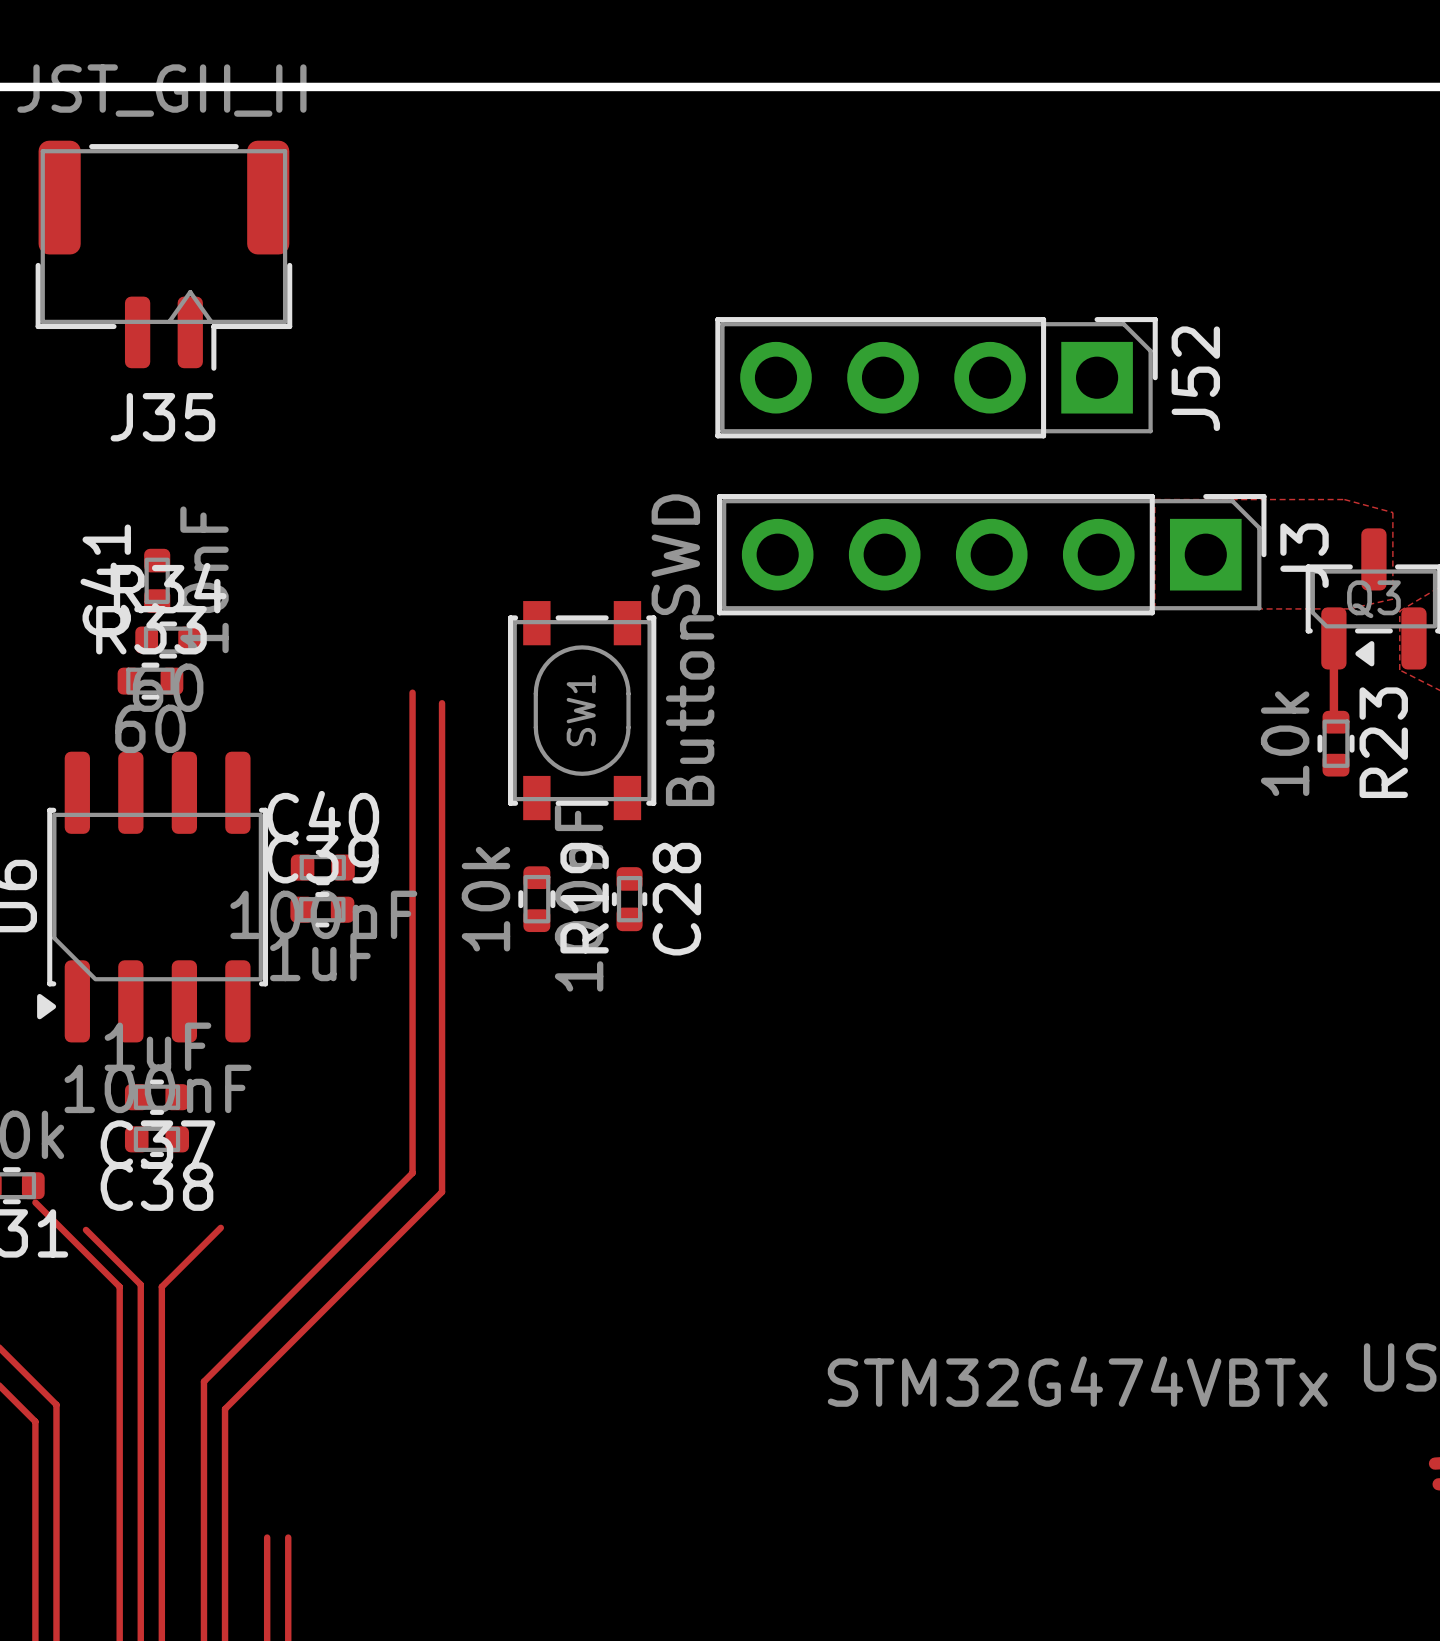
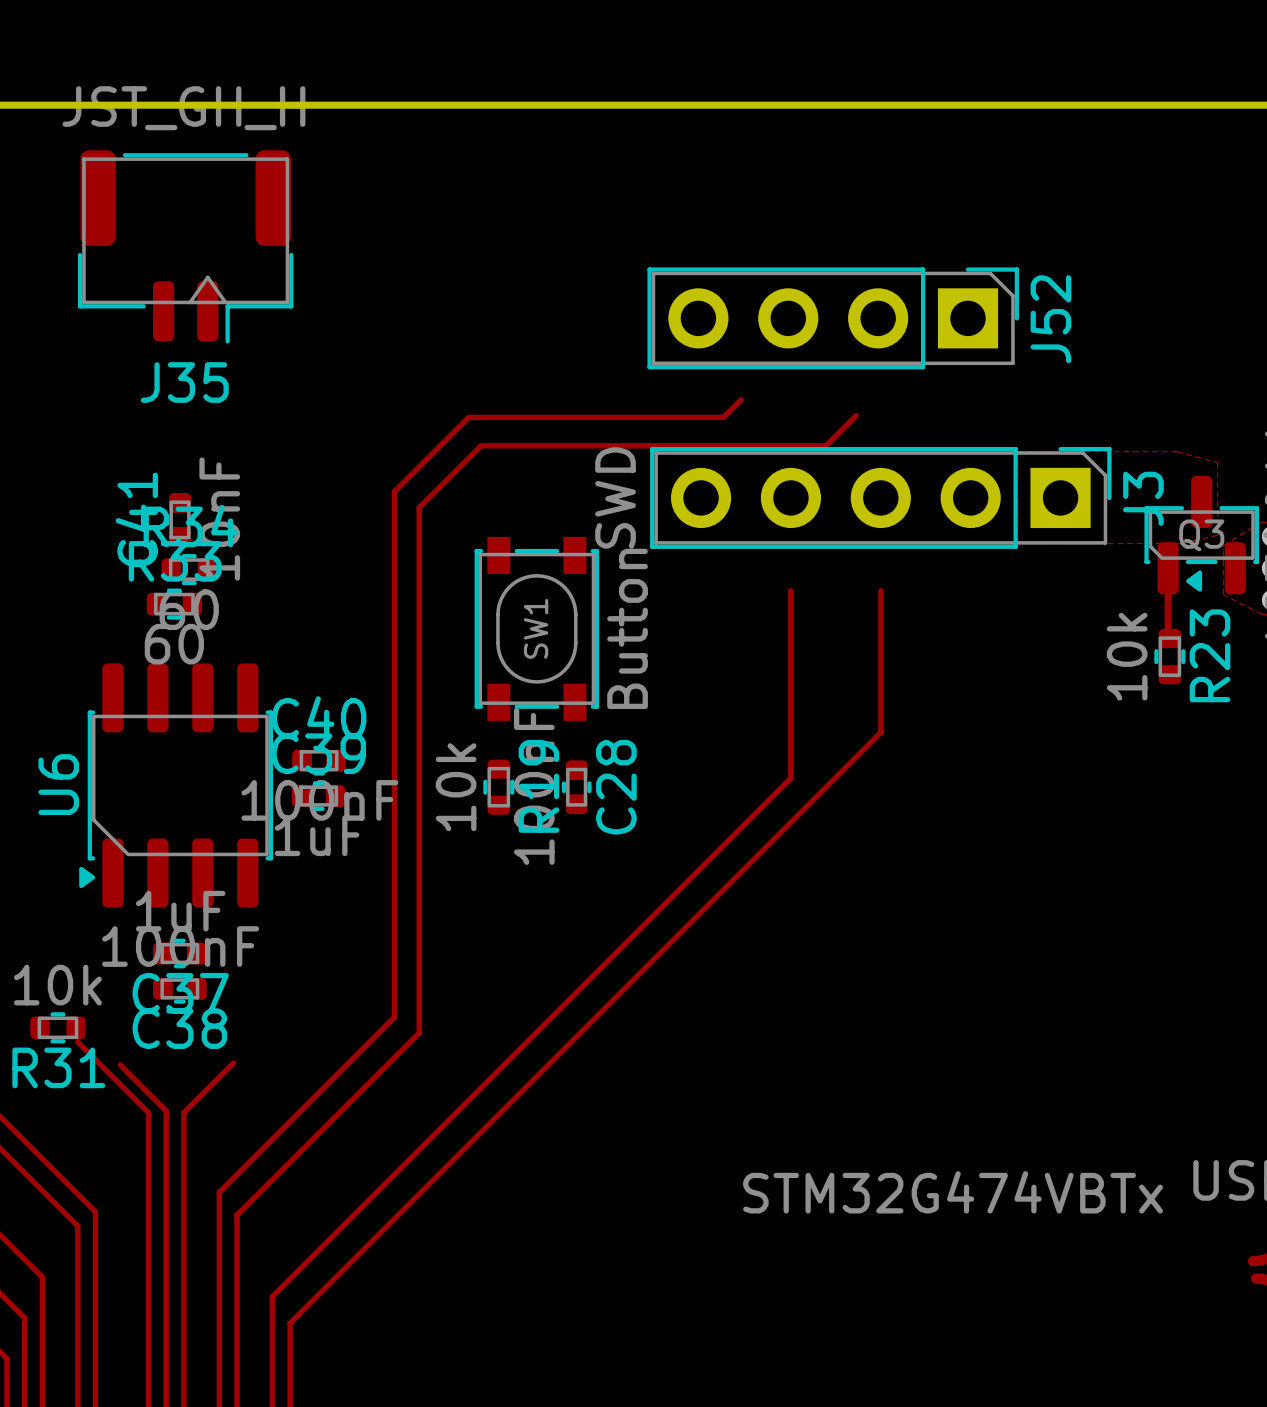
J52 position: (936, 377) -> (833, 318)
track: none -> (741, 399) (723, 417) (468, 417) (394, 491) (394, 613)
track: none -> (856, 415) (826, 445) (481, 445) (419, 507) (419, 622)
track: none -> (790, 590) (790, 778) (272, 1296) (272, 1323)
track: none -> (880, 590) (880, 732) (290, 1323)

